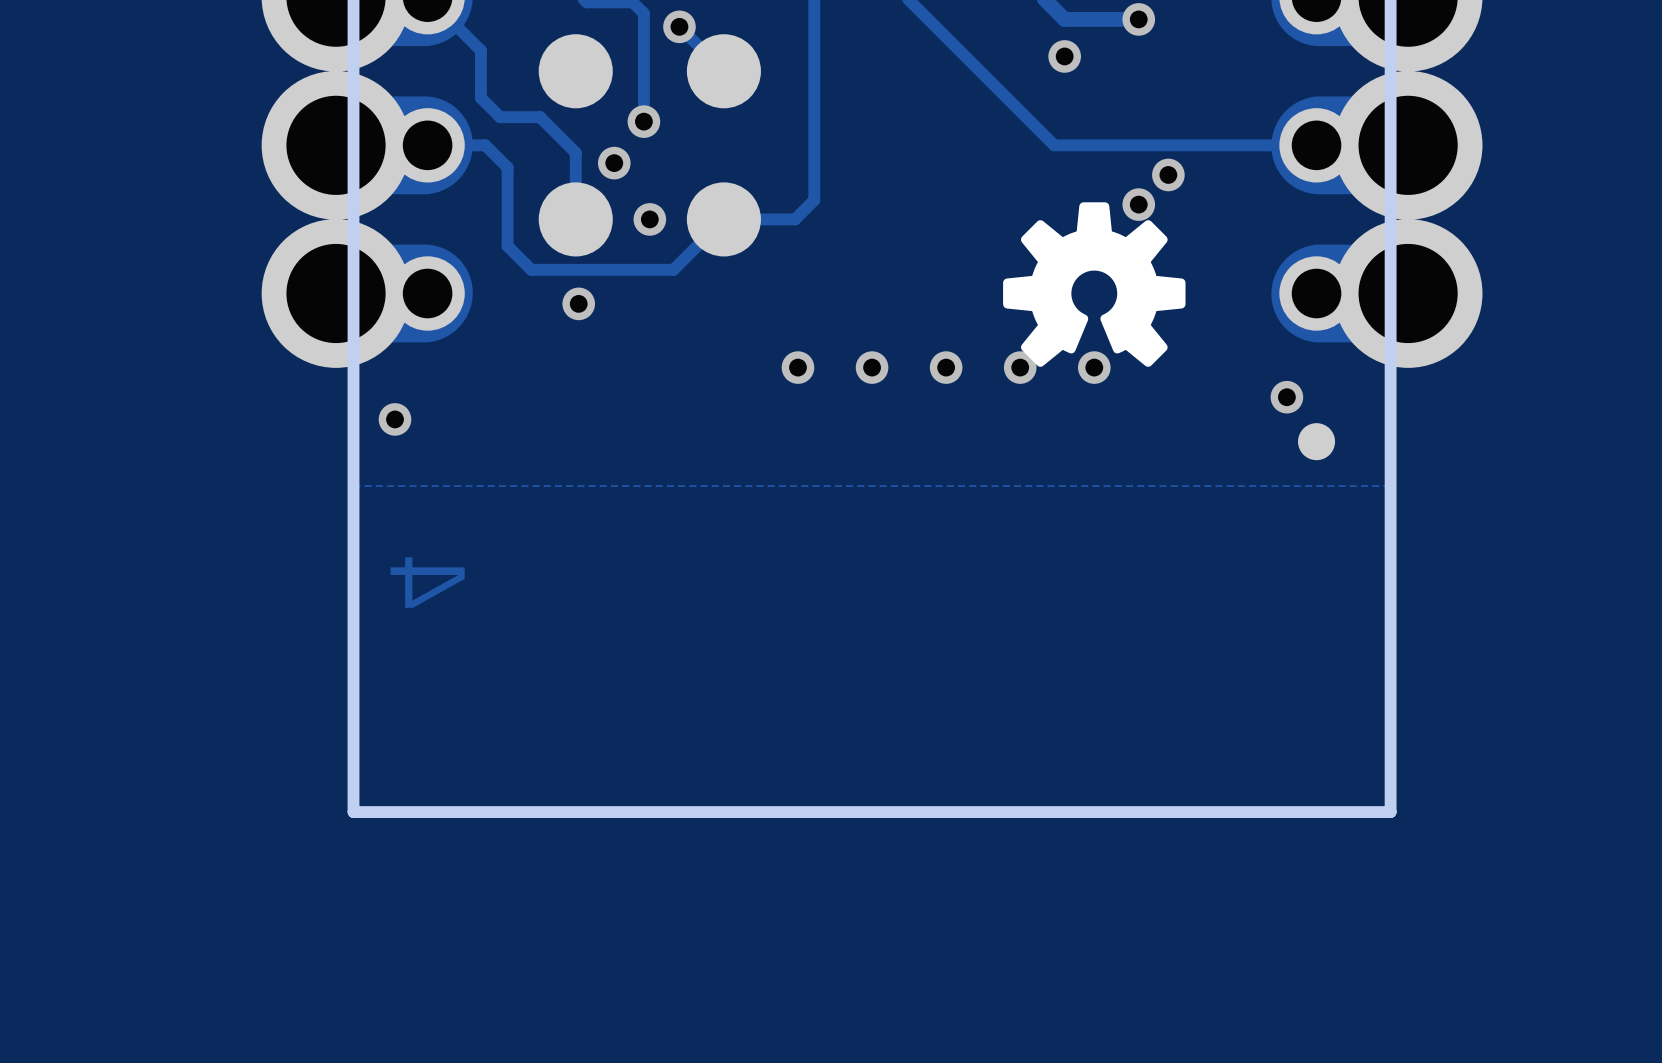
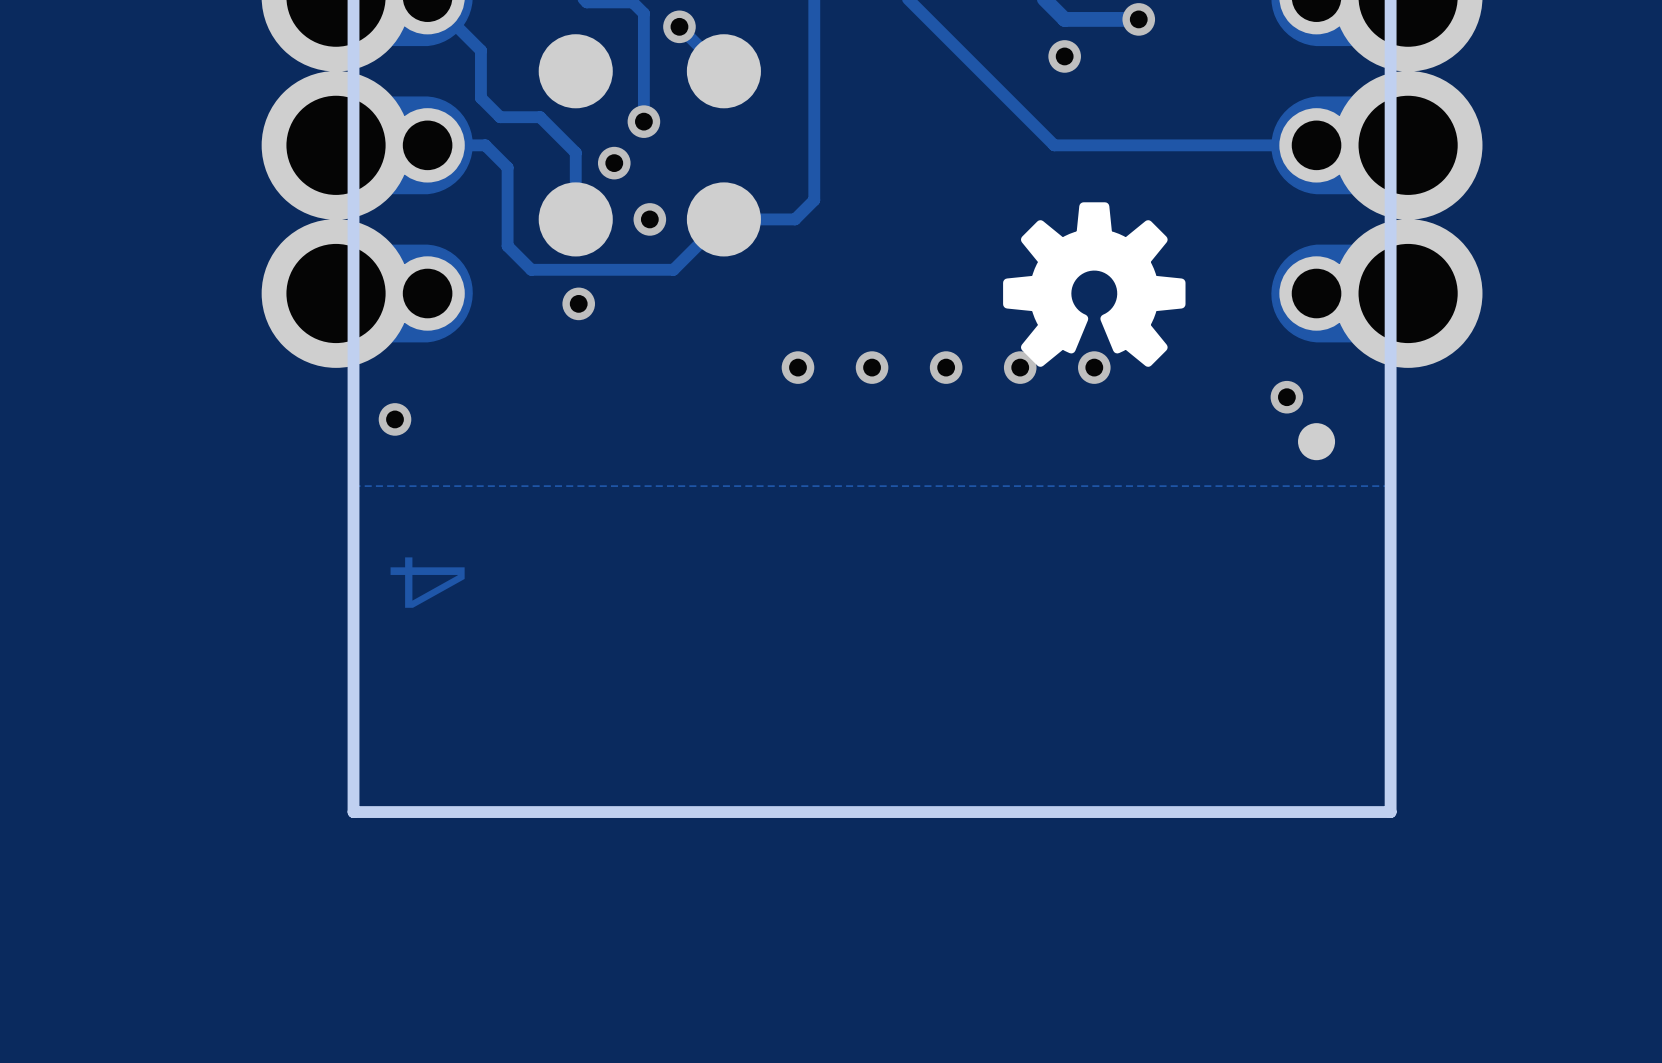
via: (1168, 174) -> none
via: (1138, 204) -> none

